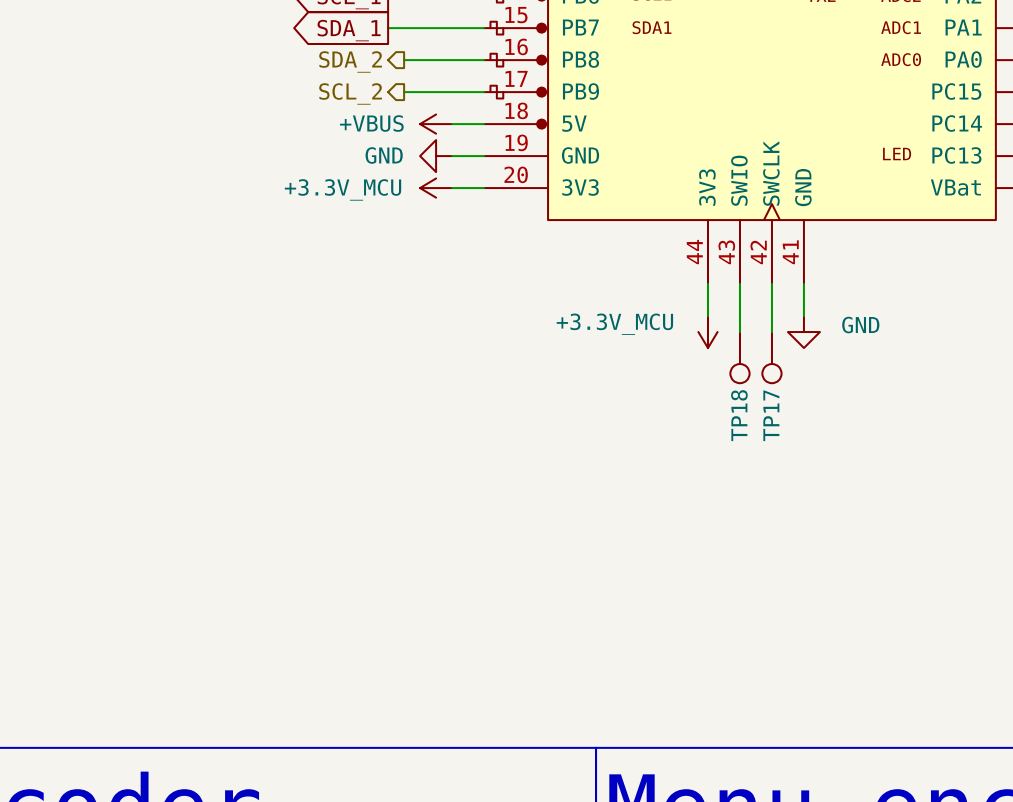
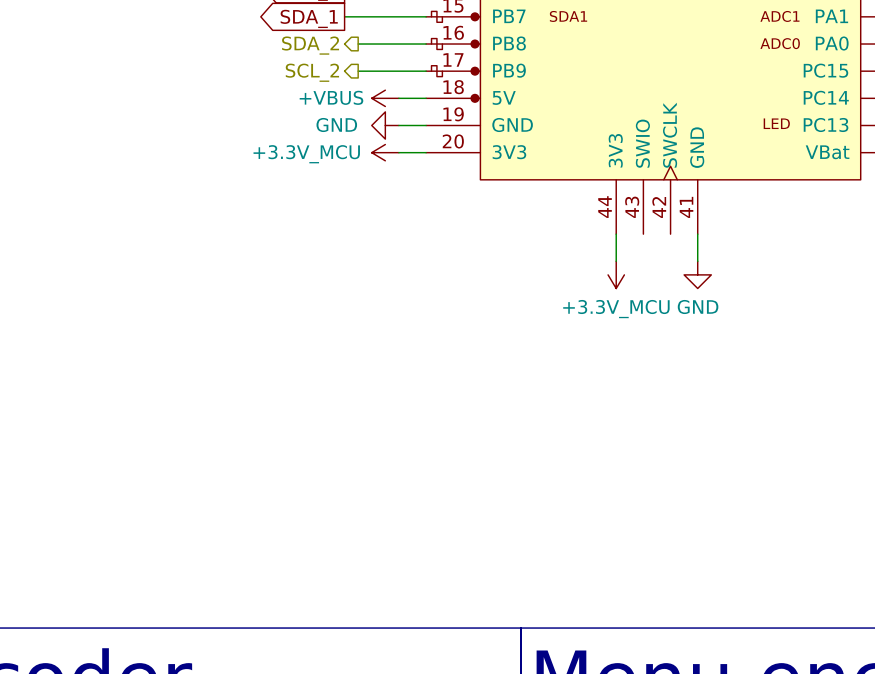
wire: (739, 284) (739, 332) -> none
wire: (771, 284) (771, 332) -> none
power symbol text position: +3.3V_MCU (614, 324) -> +3.3V_MCU (616, 309)
power symbol text position: GND (860, 325) -> GND (698, 307)
TP18: (739, 357) -> none
TP17: (771, 357) -> none

